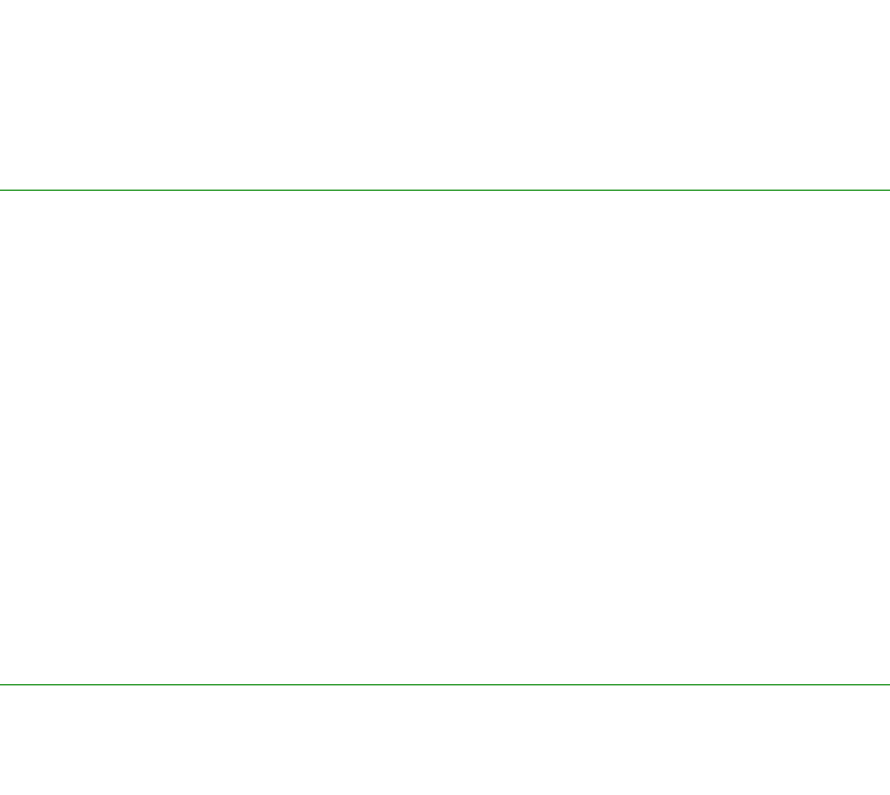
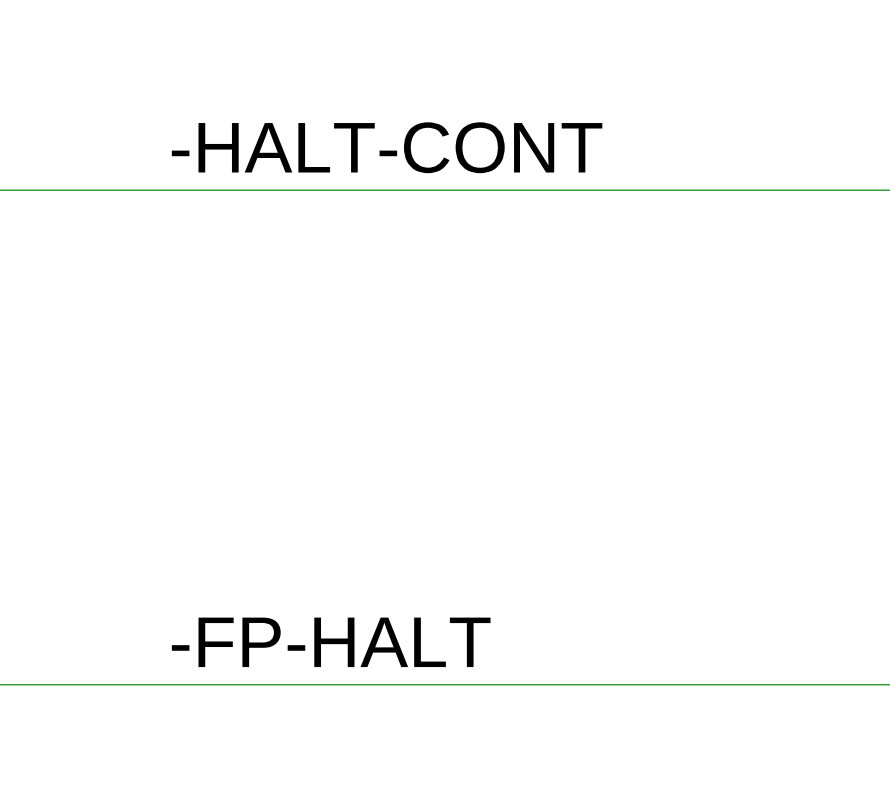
label: none -> -HALT-CONT (387, 147)
label: none -> -FP-HALT (331, 642)

